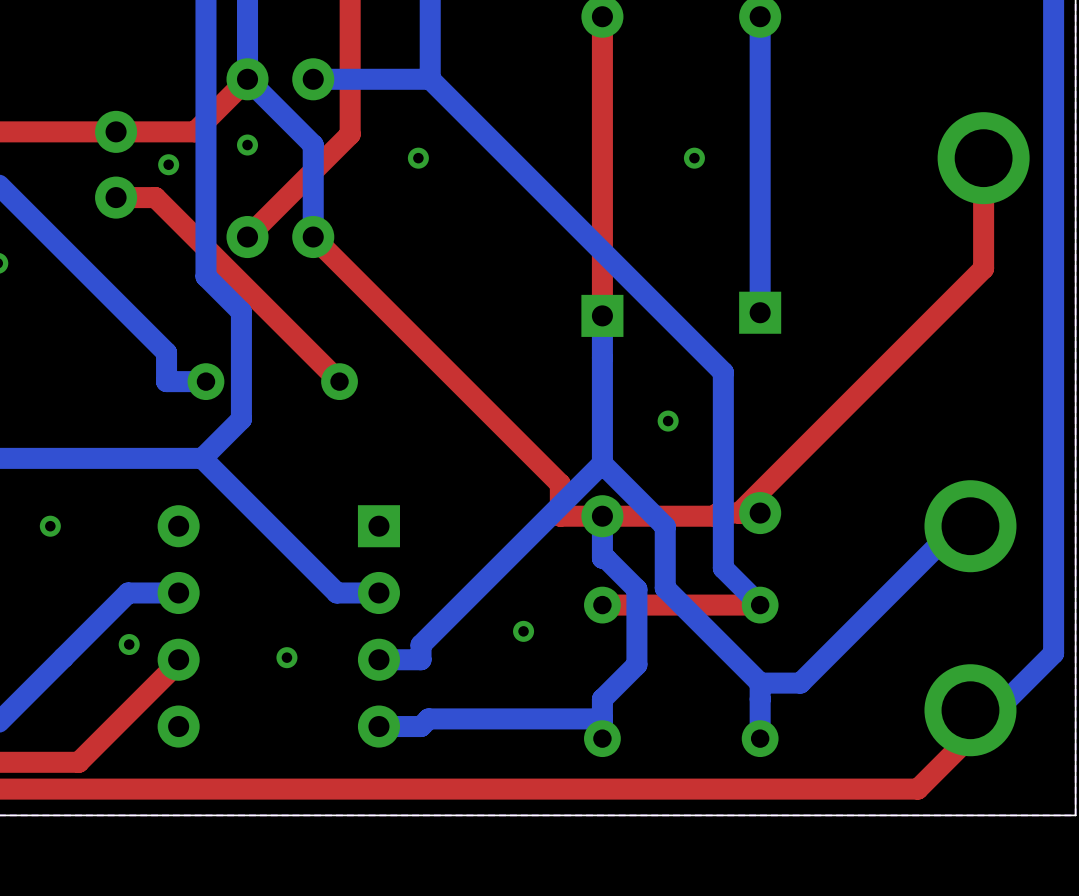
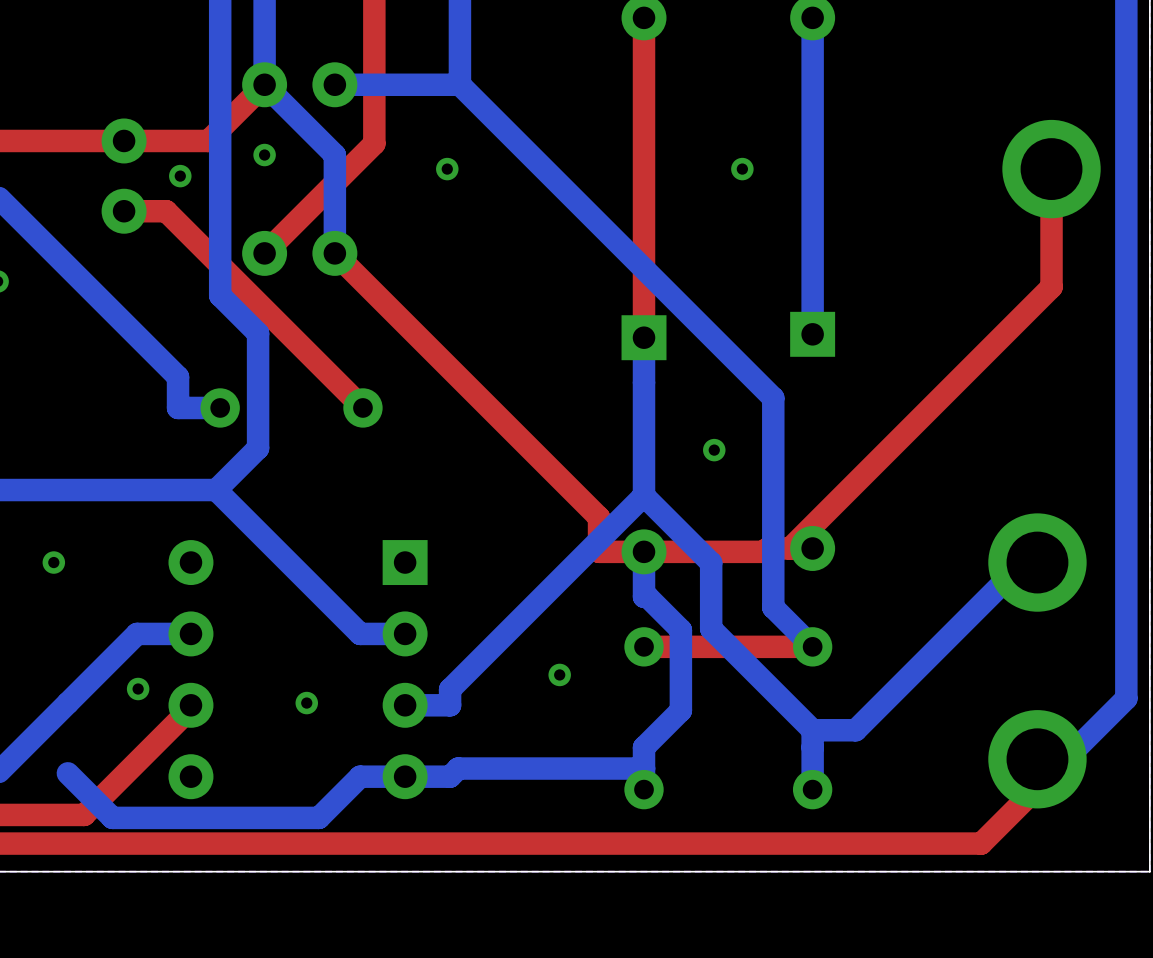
bottom track: none -> (67, 773) (112, 817) (318, 817) (360, 776) (405, 776)

